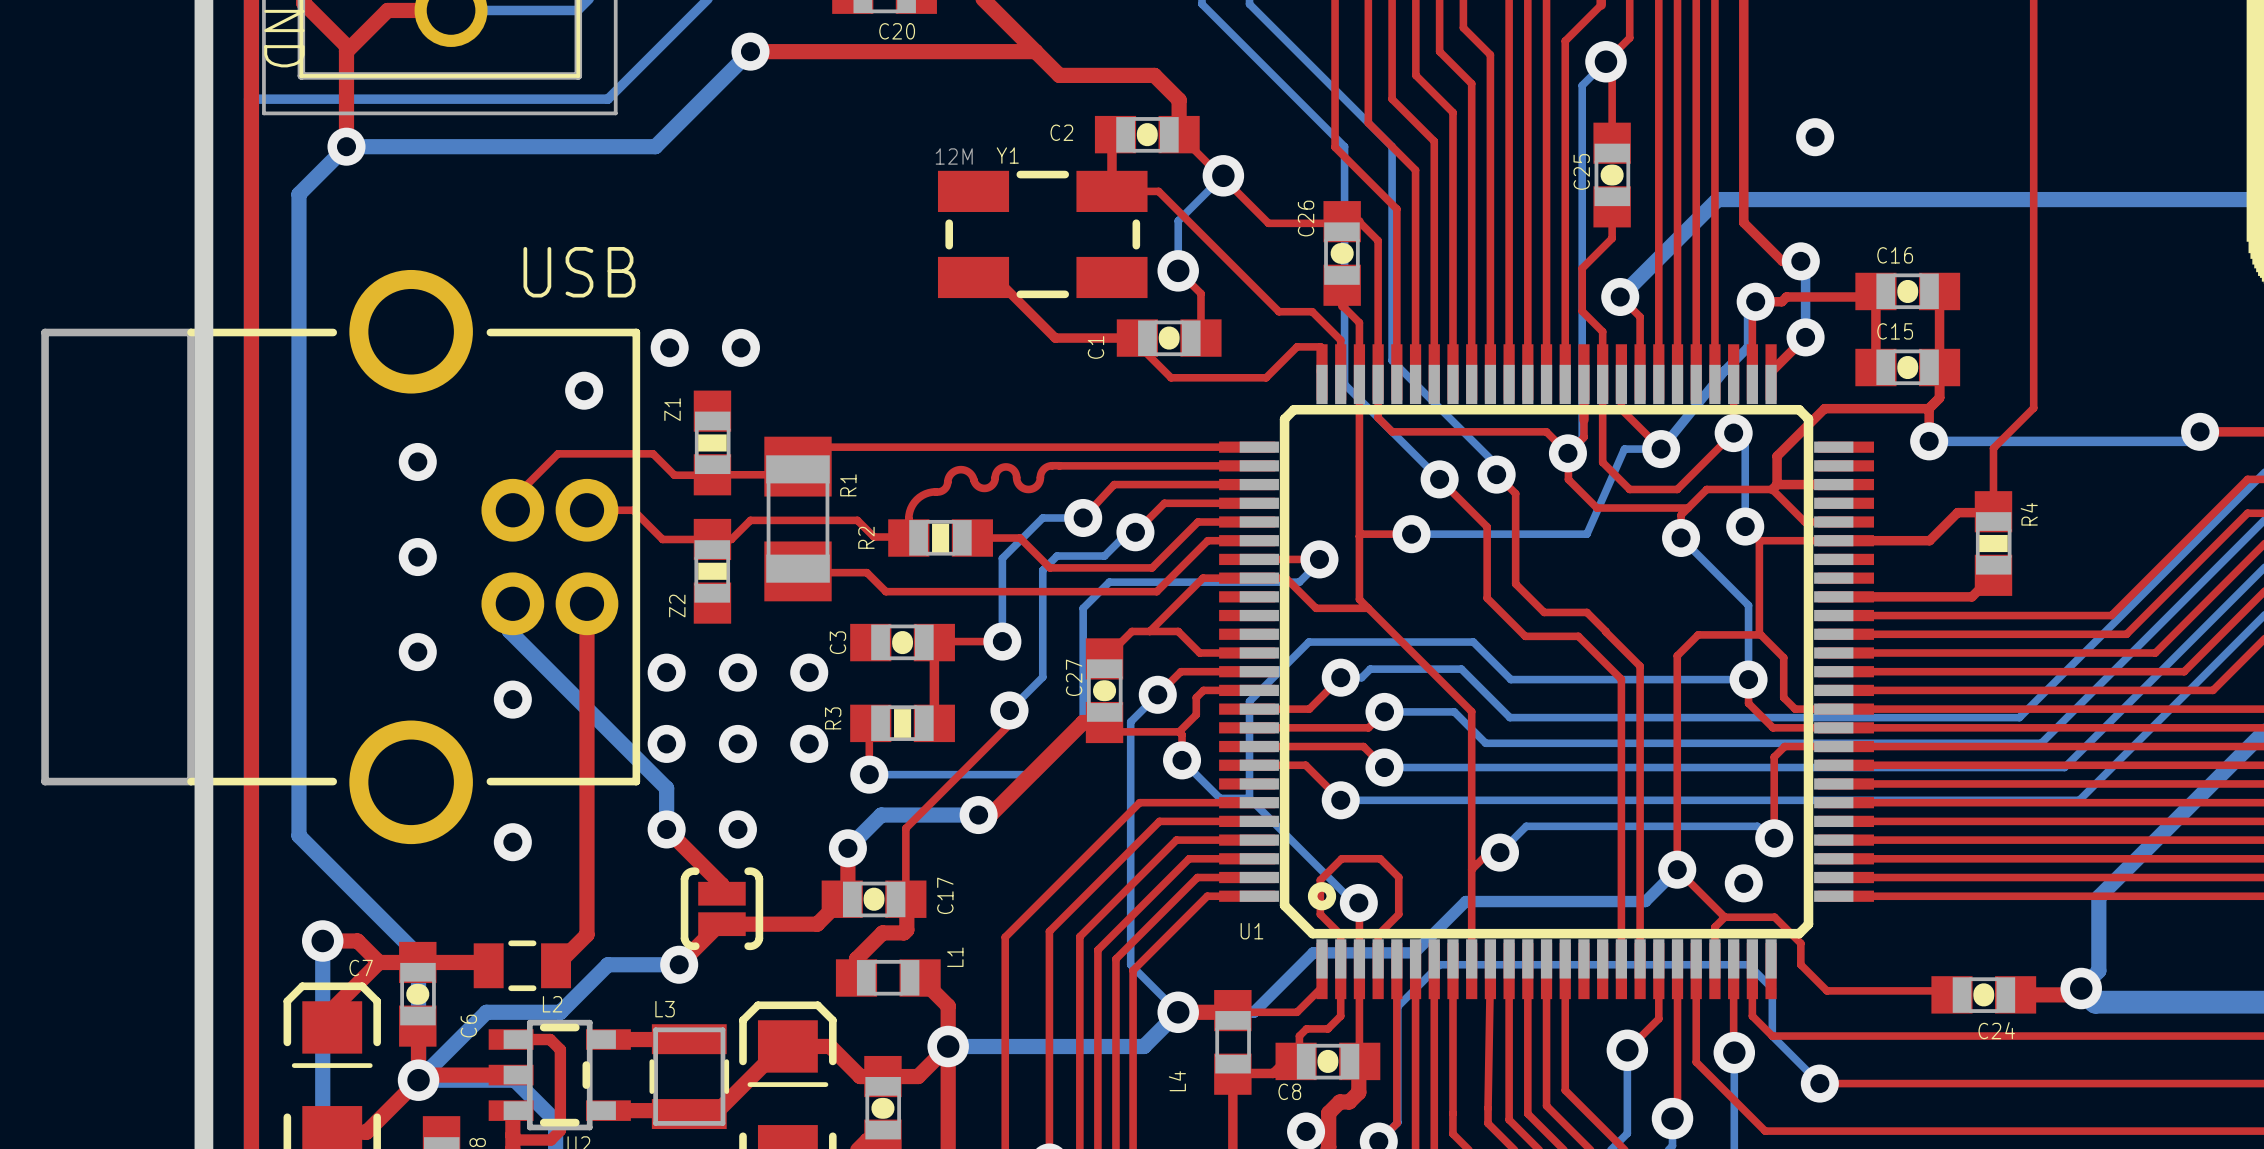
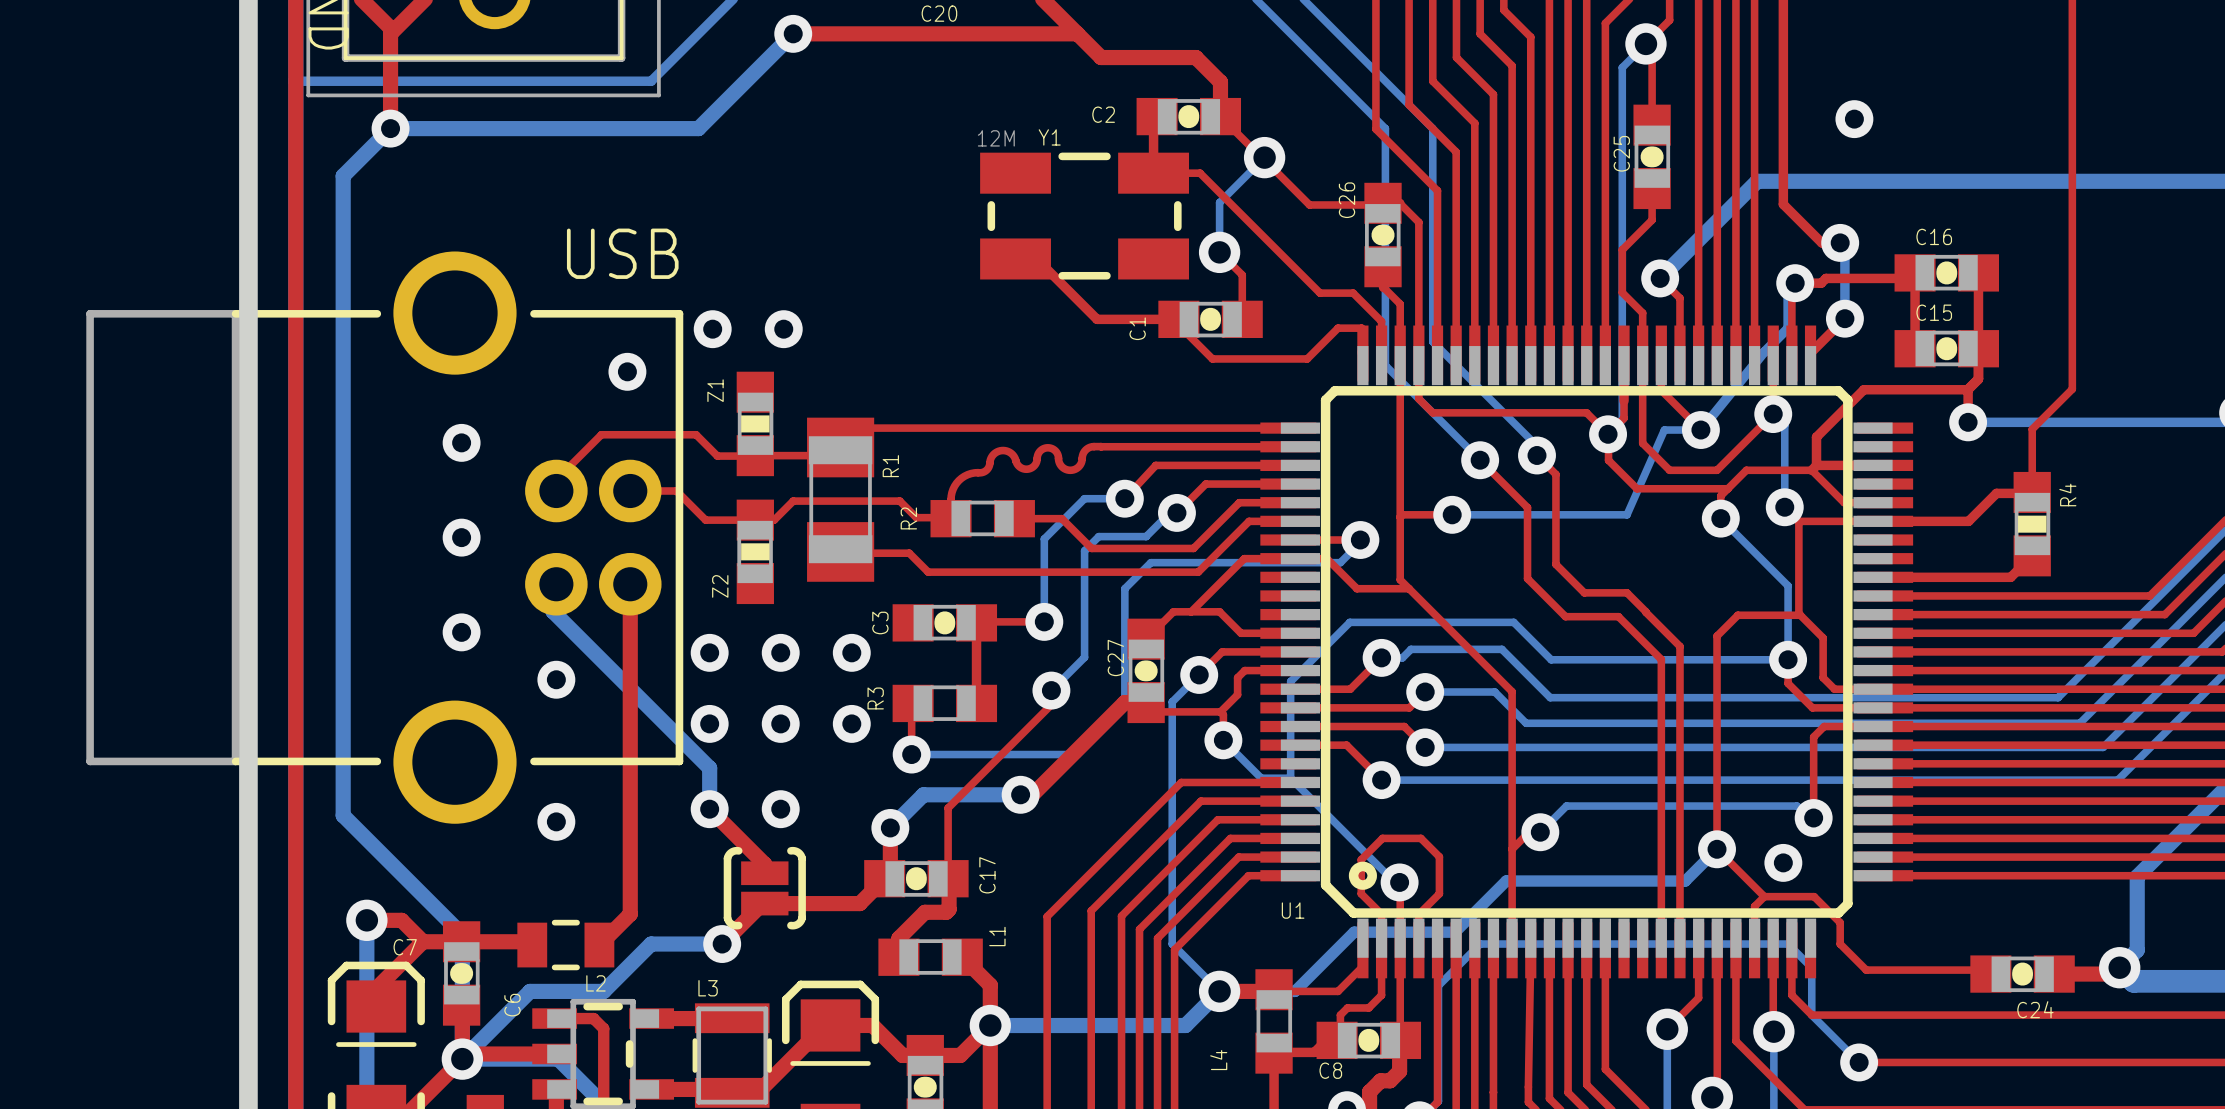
R2 footprint: [888, 519, 993, 557] -> [930, 500, 1035, 538]
R3 footprint: [850, 704, 955, 743] -> [892, 684, 998, 723]

